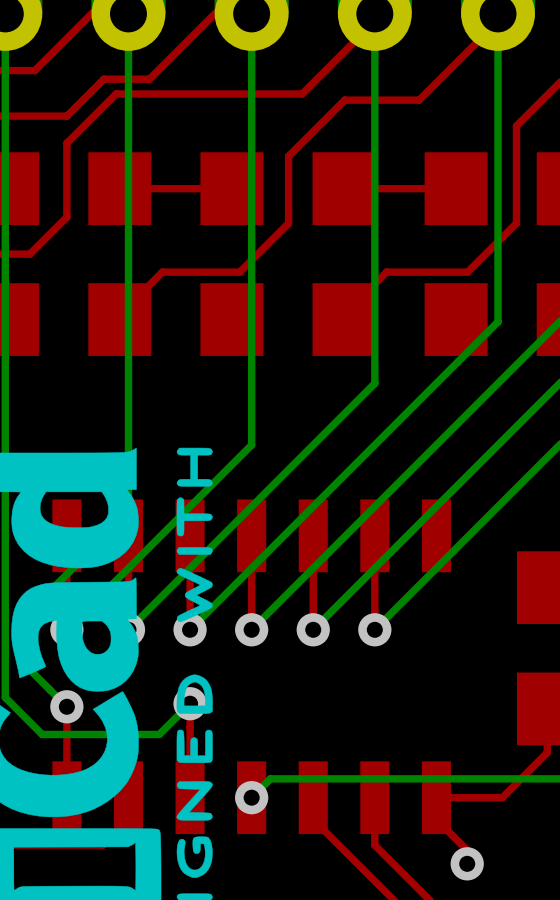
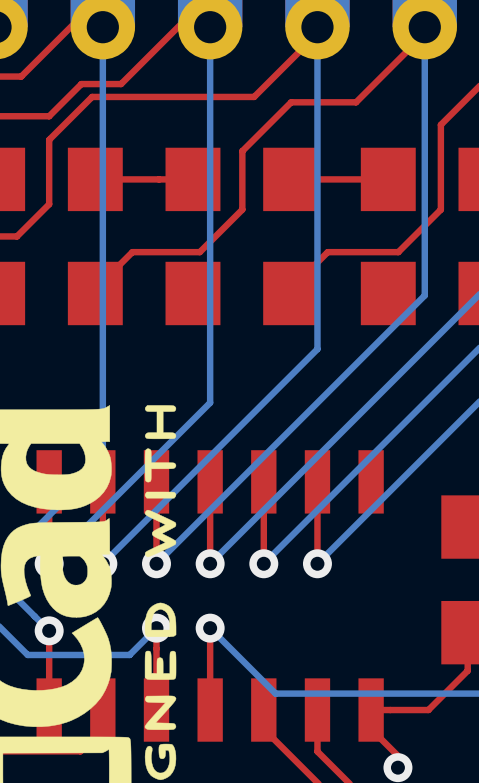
top track: none -> (210, 628) (210, 710)
bottom track: (326, 778) (270, 778) (251, 797) -> (275, 693) (210, 628)
via position: (251, 797) -> (210, 628)

